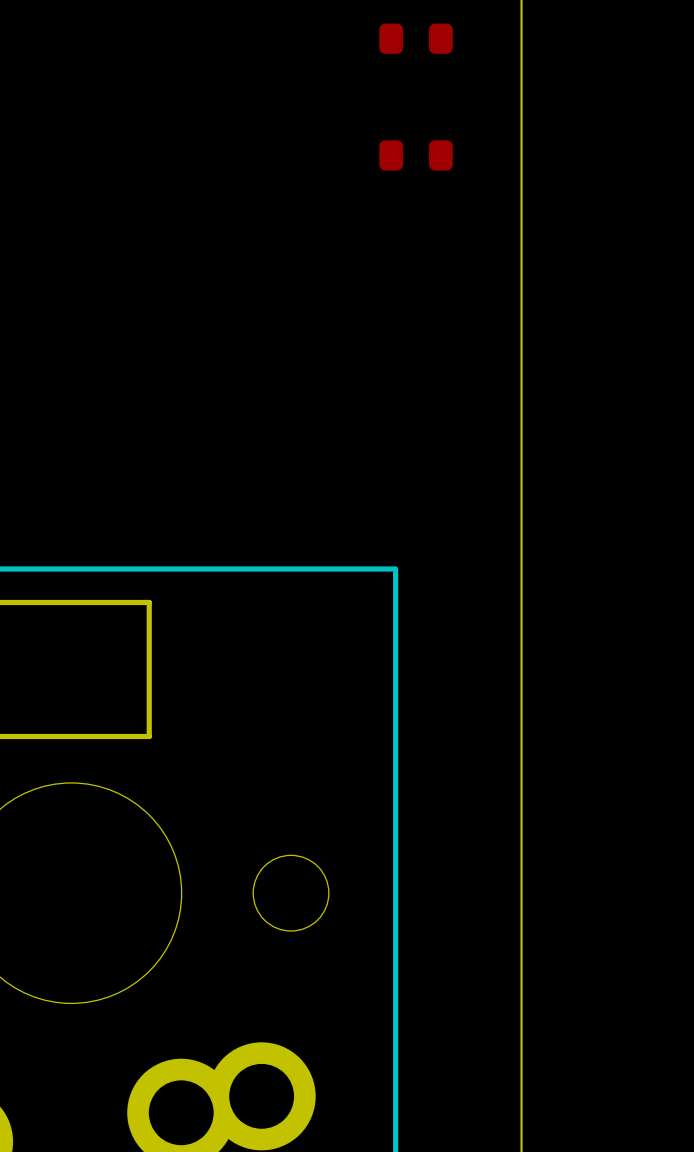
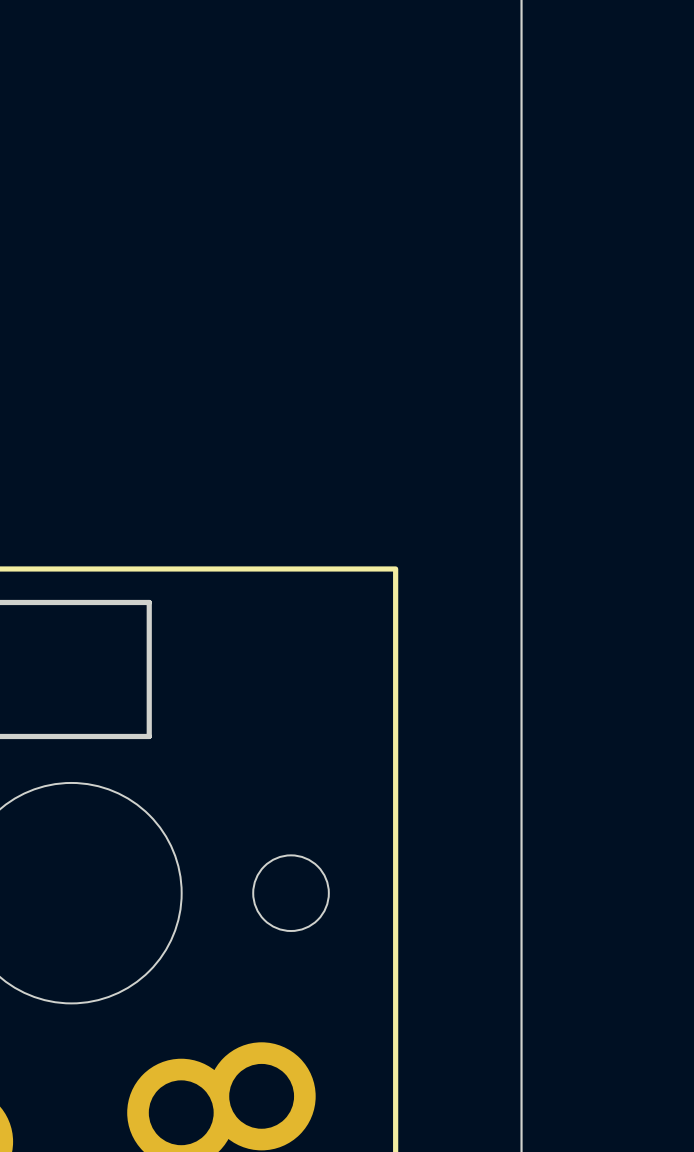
part: (416, 97) -> none

